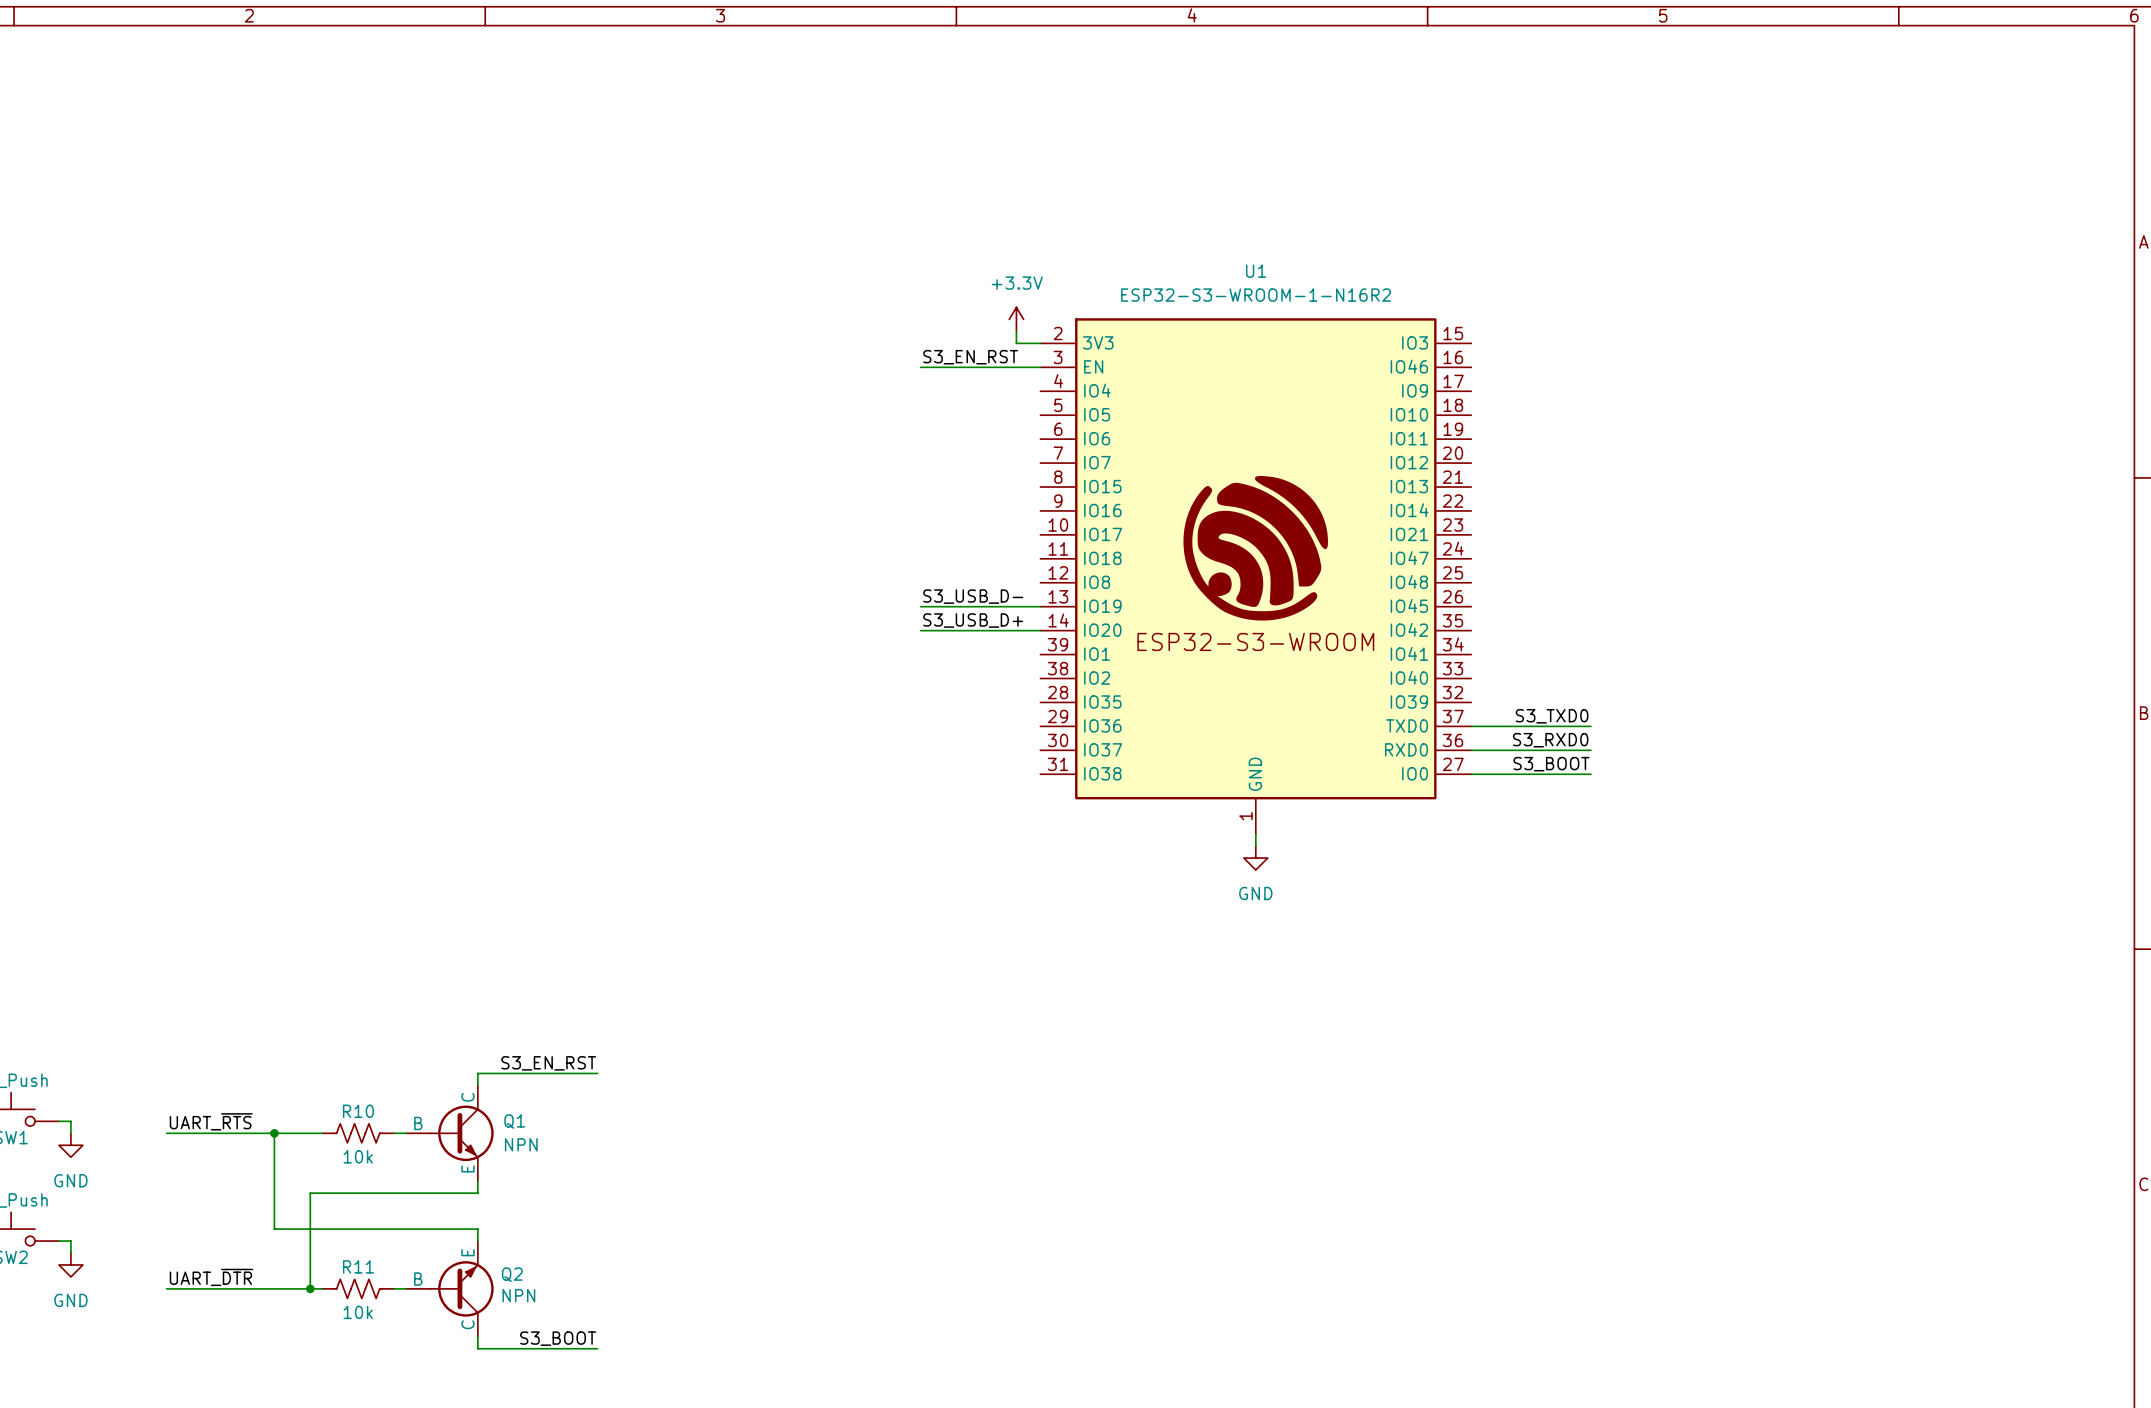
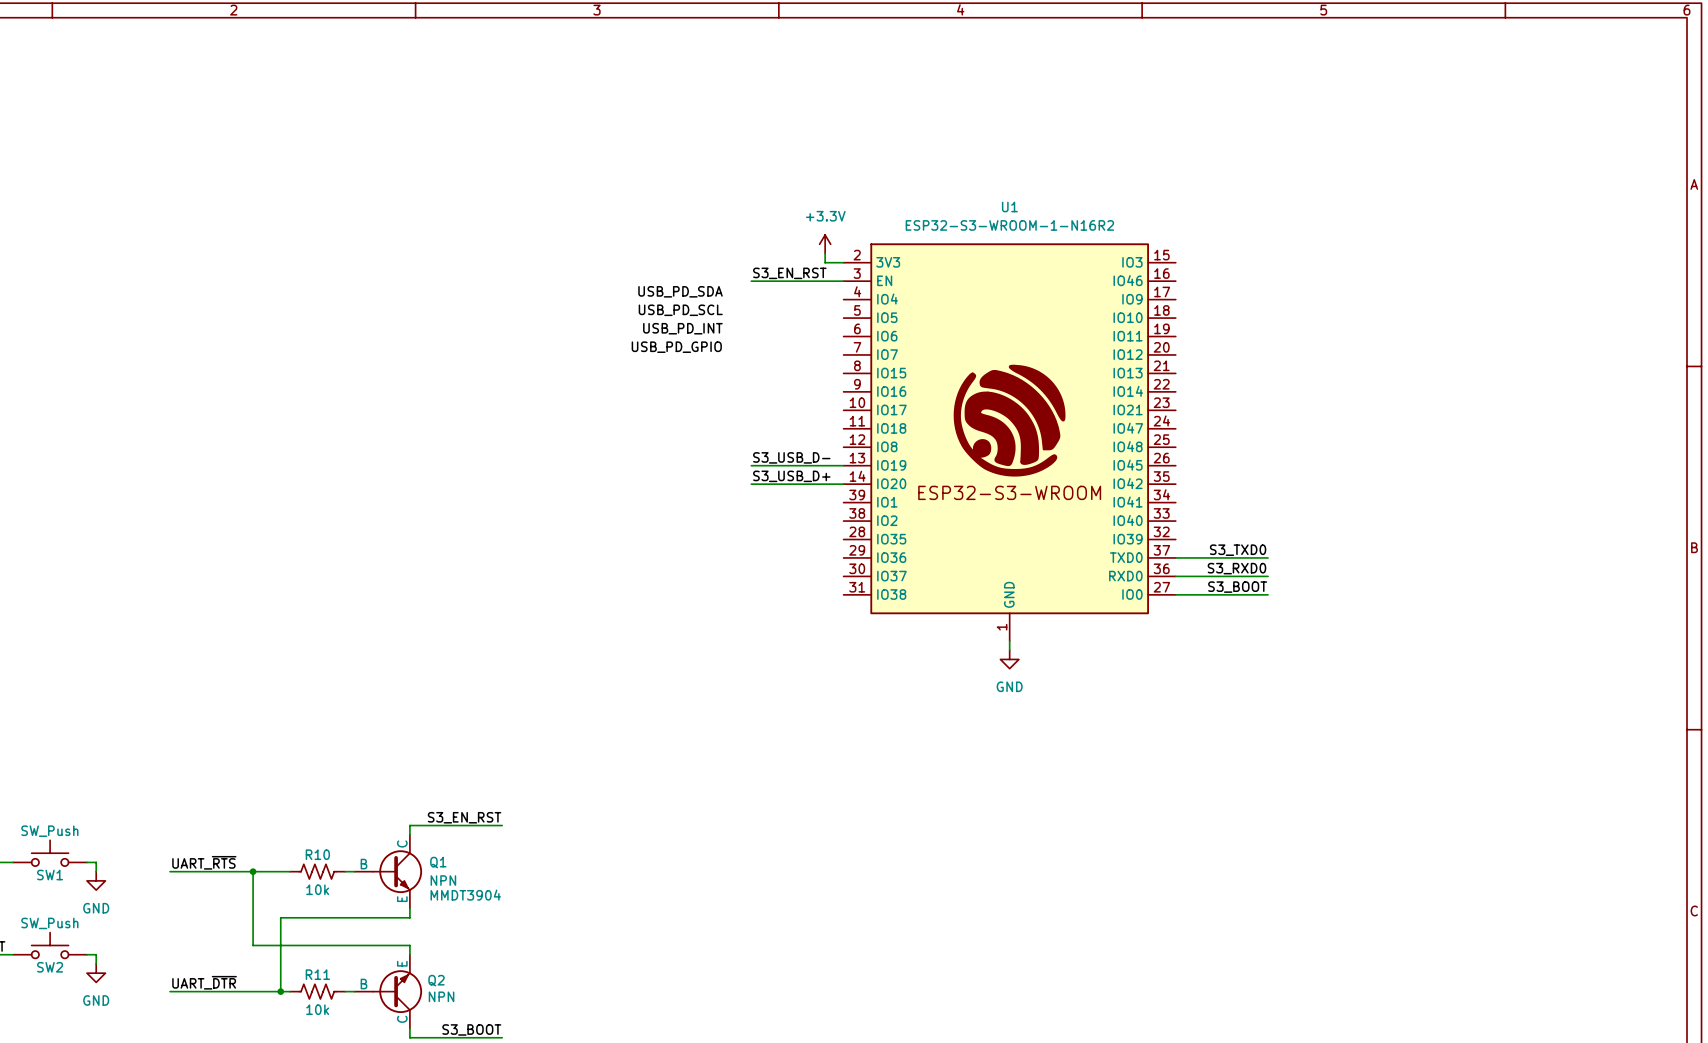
label: none -> USB_PD_SDA (680, 291)
label: none -> USB_PD_SCL (680, 310)
label: none -> USB_PD_INT (682, 328)
label: none -> USB_PD_GPIO (676, 347)
Q1 text: none -> MMDT3904 (465, 895)

